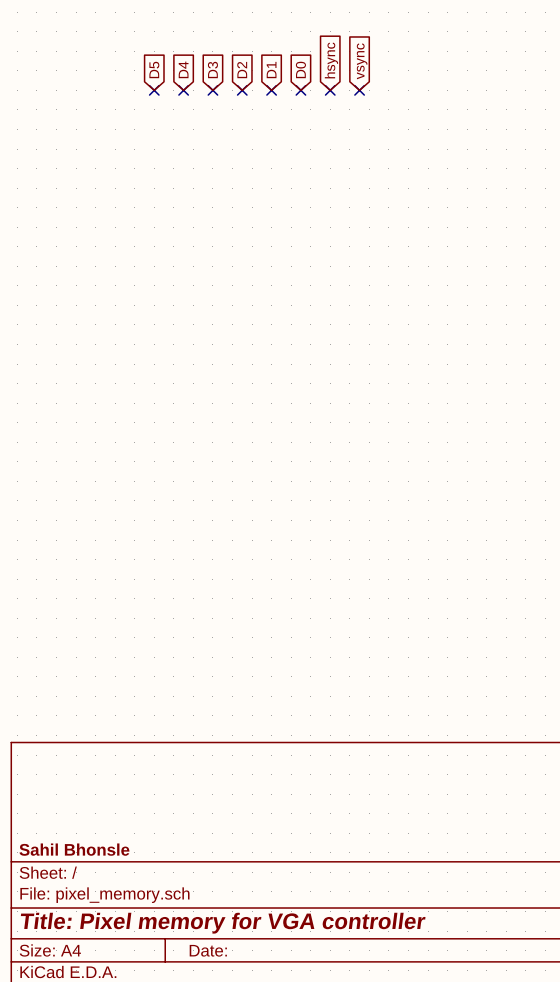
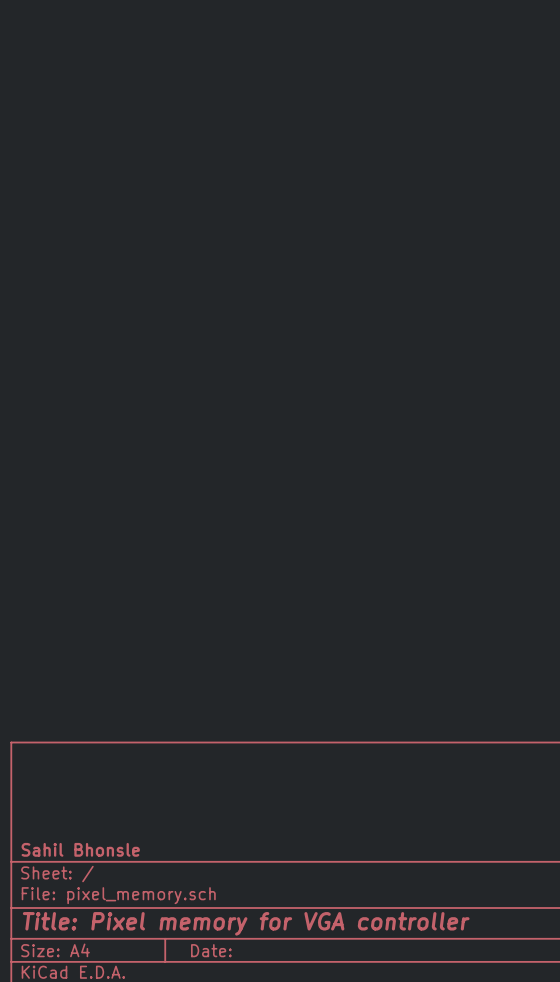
global label: hsync (331, 60) -> none
global label: vsync (362, 61) -> none
global label: D5 (154, 69) -> none
global label: D4 (183, 69) -> none
global label: D0 (300, 69) -> none
global label: D3 (212, 70) -> none
global label: D2 (242, 70) -> none
global label: D1 (271, 70) -> none
no-connect mark: (154, 90) -> none
no-connect mark: (183, 90) -> none
no-connect mark: (212, 90) -> none
no-connect mark: (242, 90) -> none
no-connect mark: (271, 90) -> none
no-connect mark: (300, 90) -> none
no-connect mark: (330, 90) -> none
no-connect mark: (359, 90) -> none

